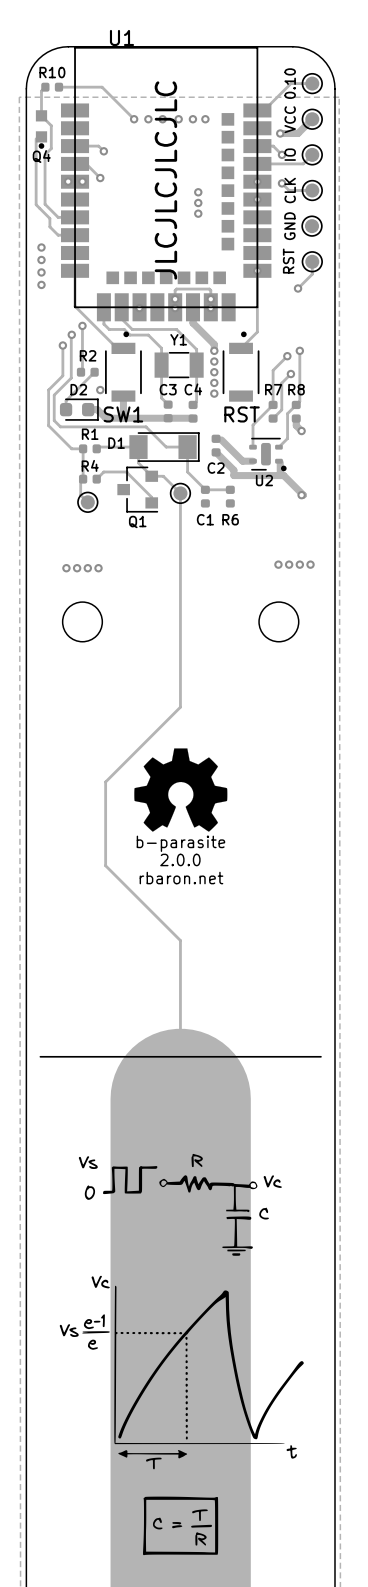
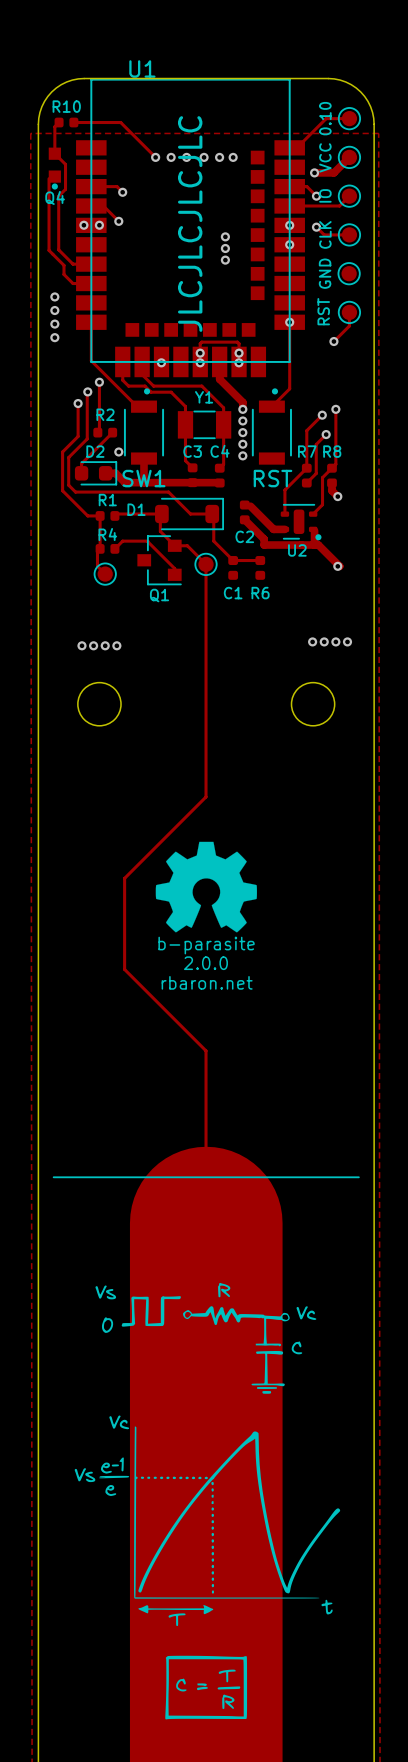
D1 footprint: [129, 432, 200, 462] -> [155, 497, 224, 531]

